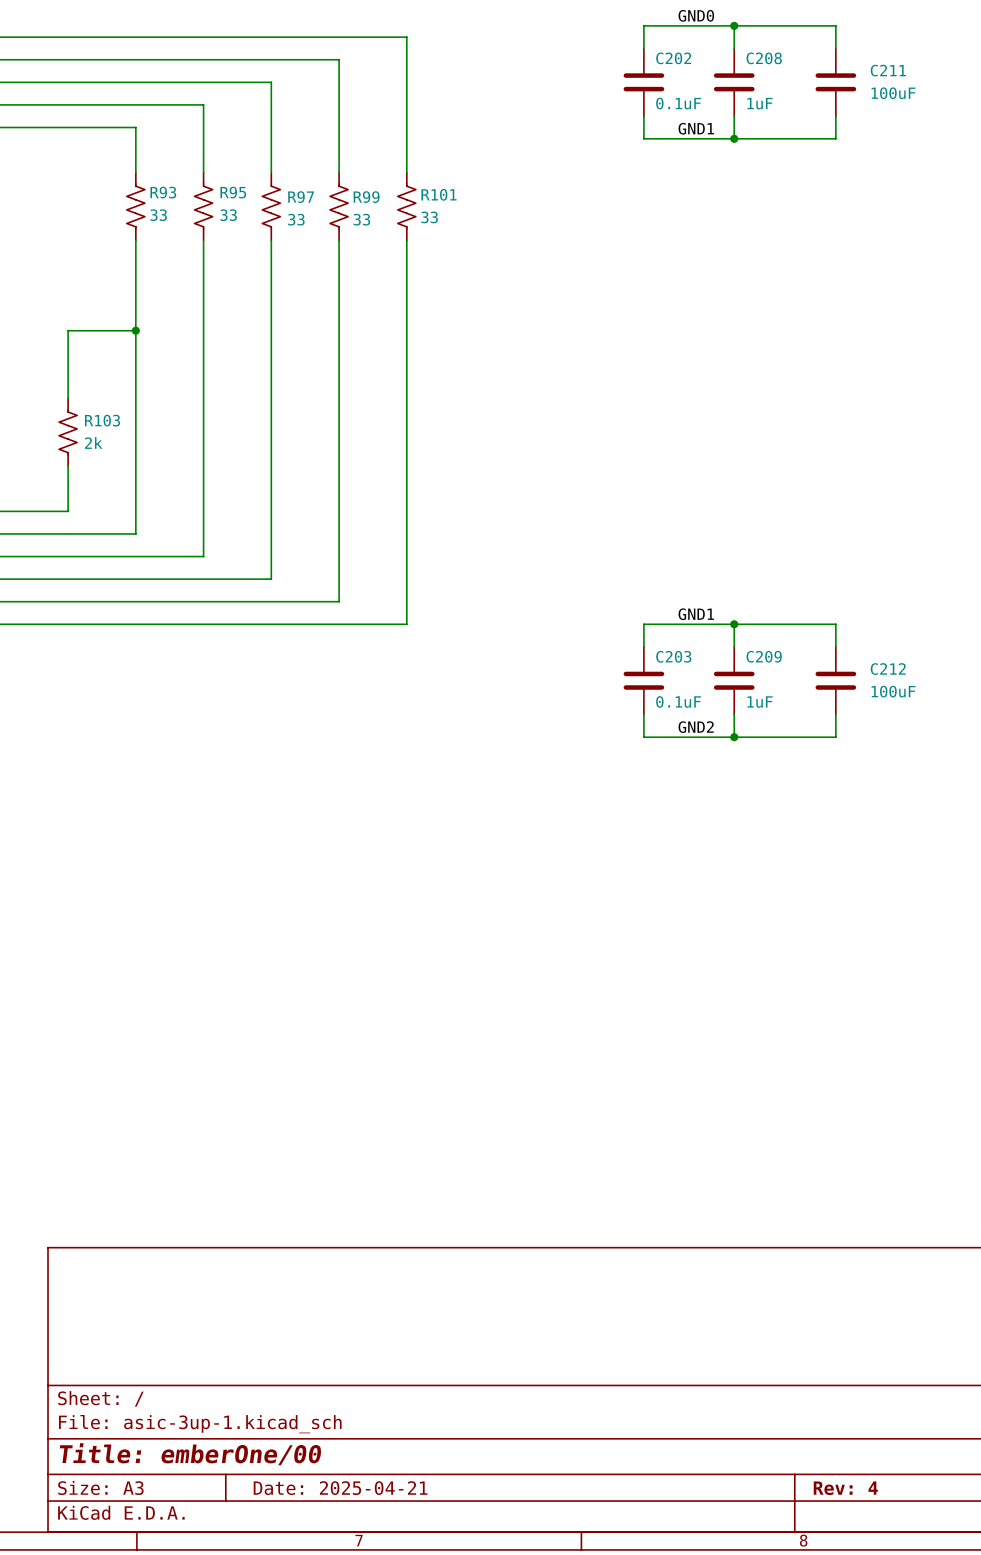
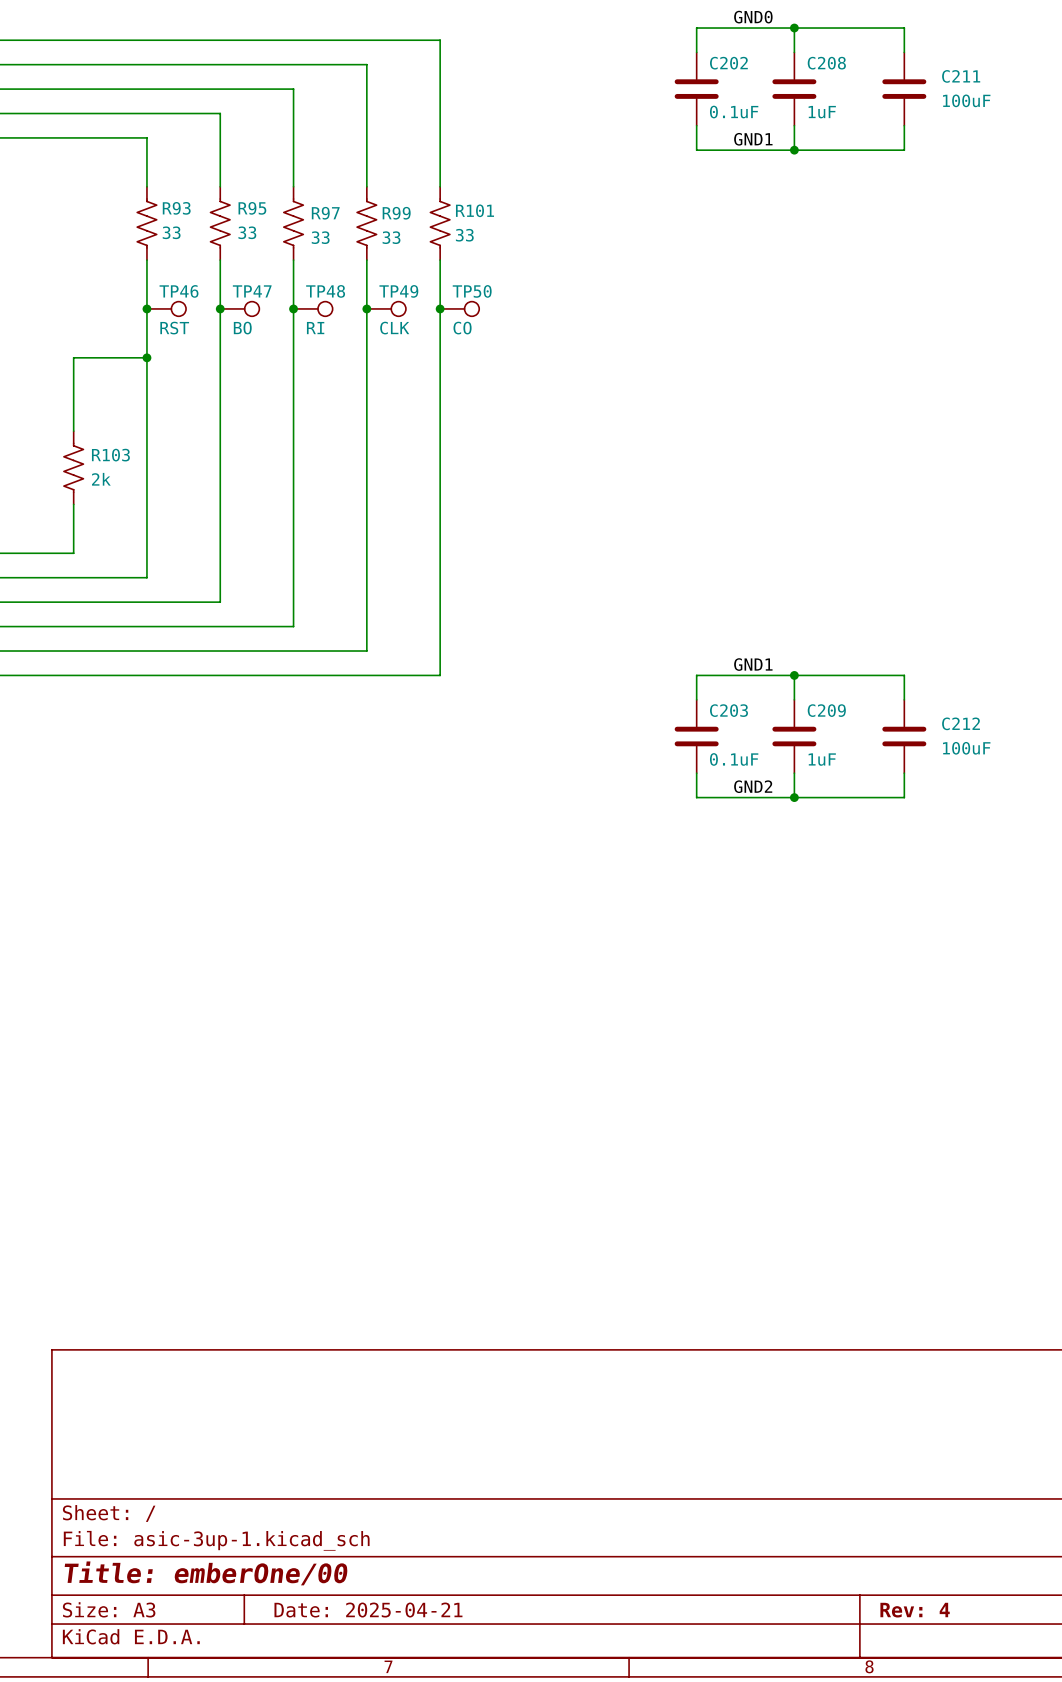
junction: none -> (146, 308)
TP46: none -> RST (166, 308)
junction: none -> (220, 308)
TP47: none -> BO (239, 308)
junction: none -> (293, 308)
TP48: none -> RI (313, 308)
junction: none -> (366, 308)
TP49: none -> CLK (386, 308)
junction: none -> (440, 308)
TP50: none -> CO (459, 308)

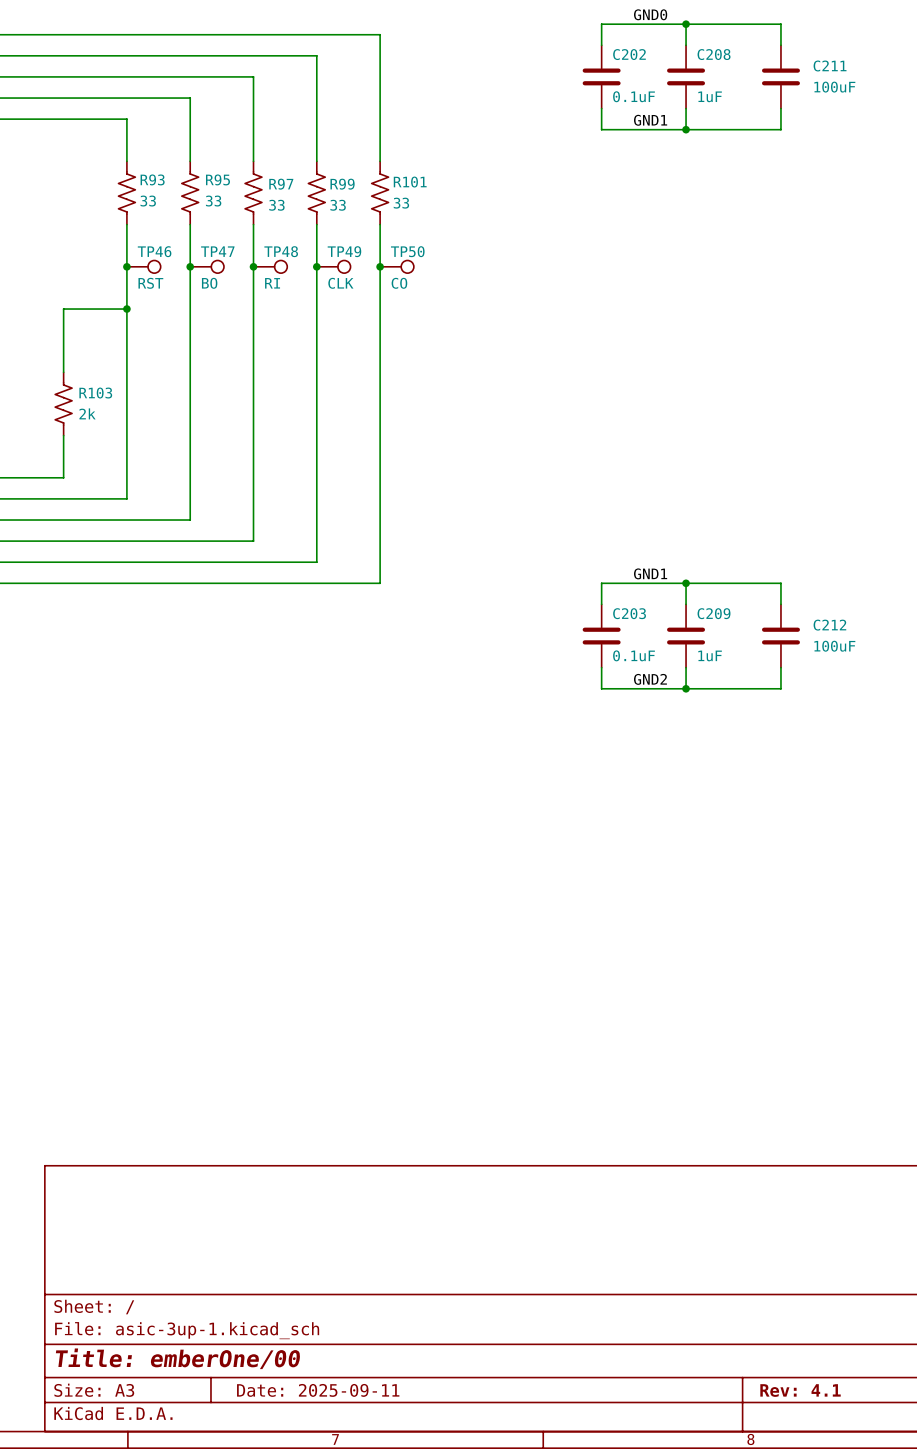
title block: Date: 2025-04-21 (368, 1610) -> Date: 2025-09-11 (318, 1390)
title block: Rev: 4 (915, 1610) -> Rev: 4.1 (800, 1390)

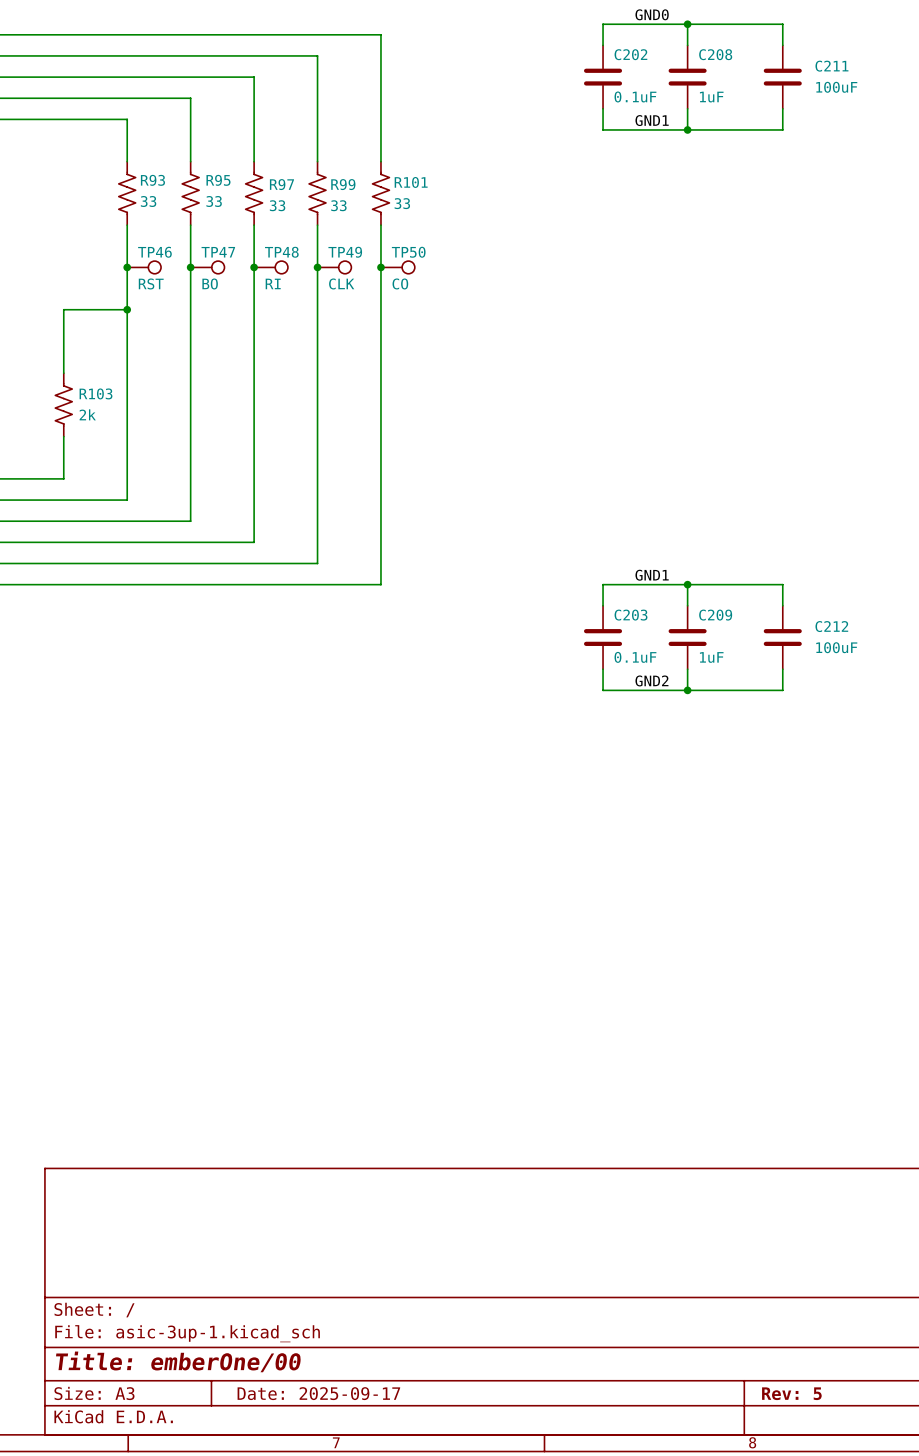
title block: Date: 2025-09-11 (318, 1390) -> Date: 2025-09-17 (318, 1393)
title block: Rev: 4.1 (800, 1390) -> Rev: 5 (791, 1393)

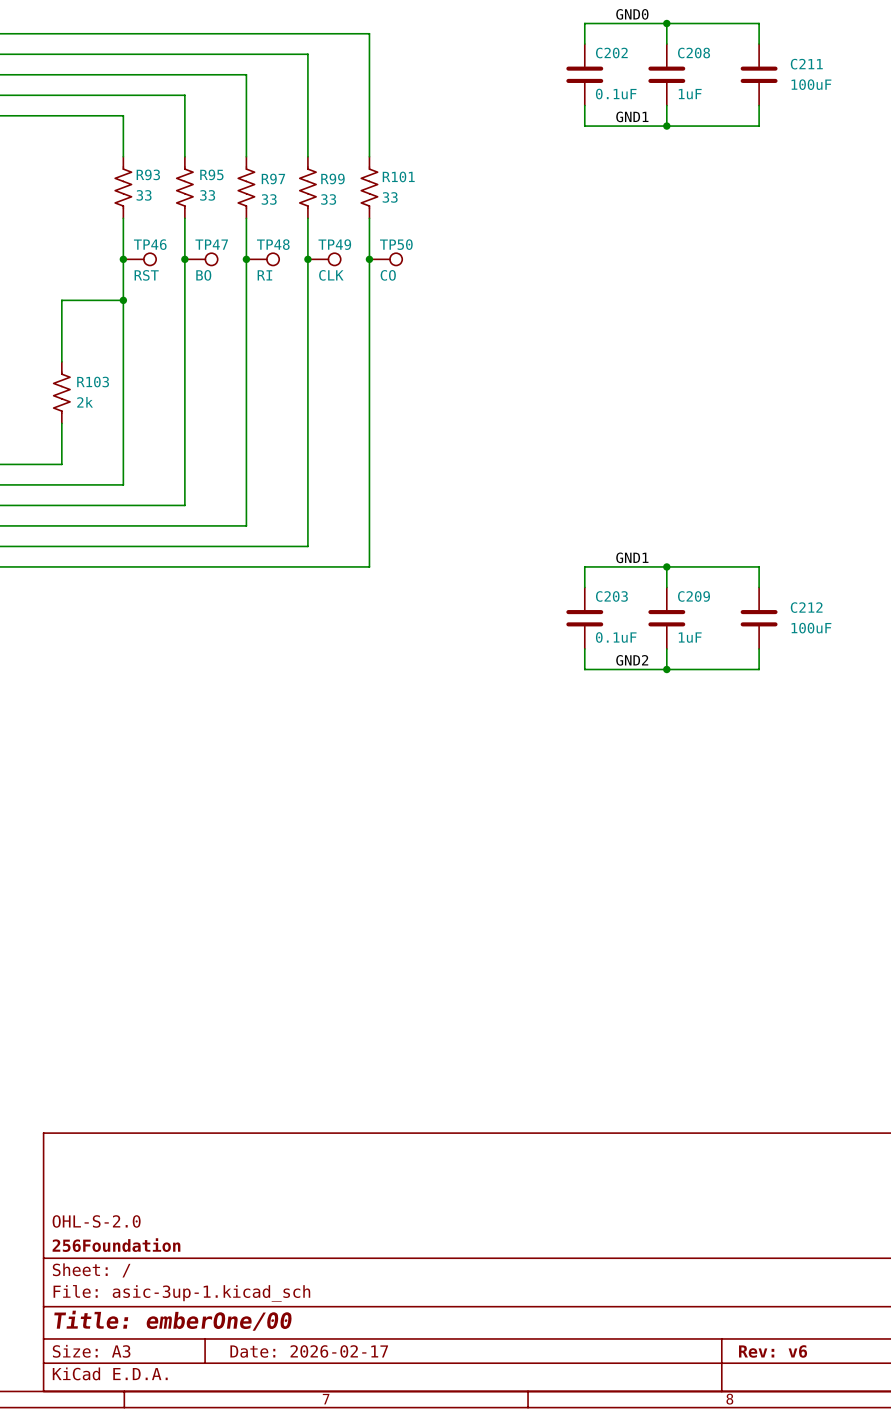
title block: none -> OHL-S-2.0 (96, 1221)
title block: none -> 256Foundation (116, 1245)
title block: Date: 2025-09-17 (318, 1393) -> Date: 2026-02-17 (309, 1351)
title block: Rev: 5 (791, 1393) -> Rev: v6 (773, 1351)

